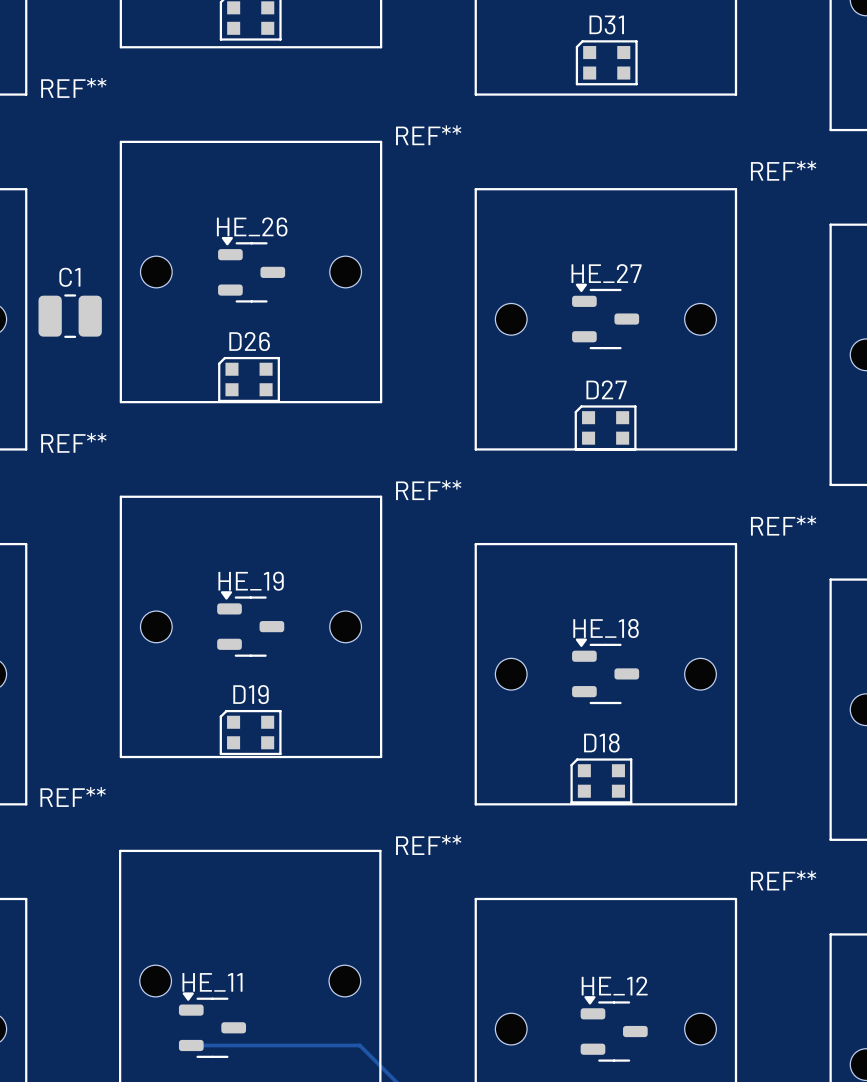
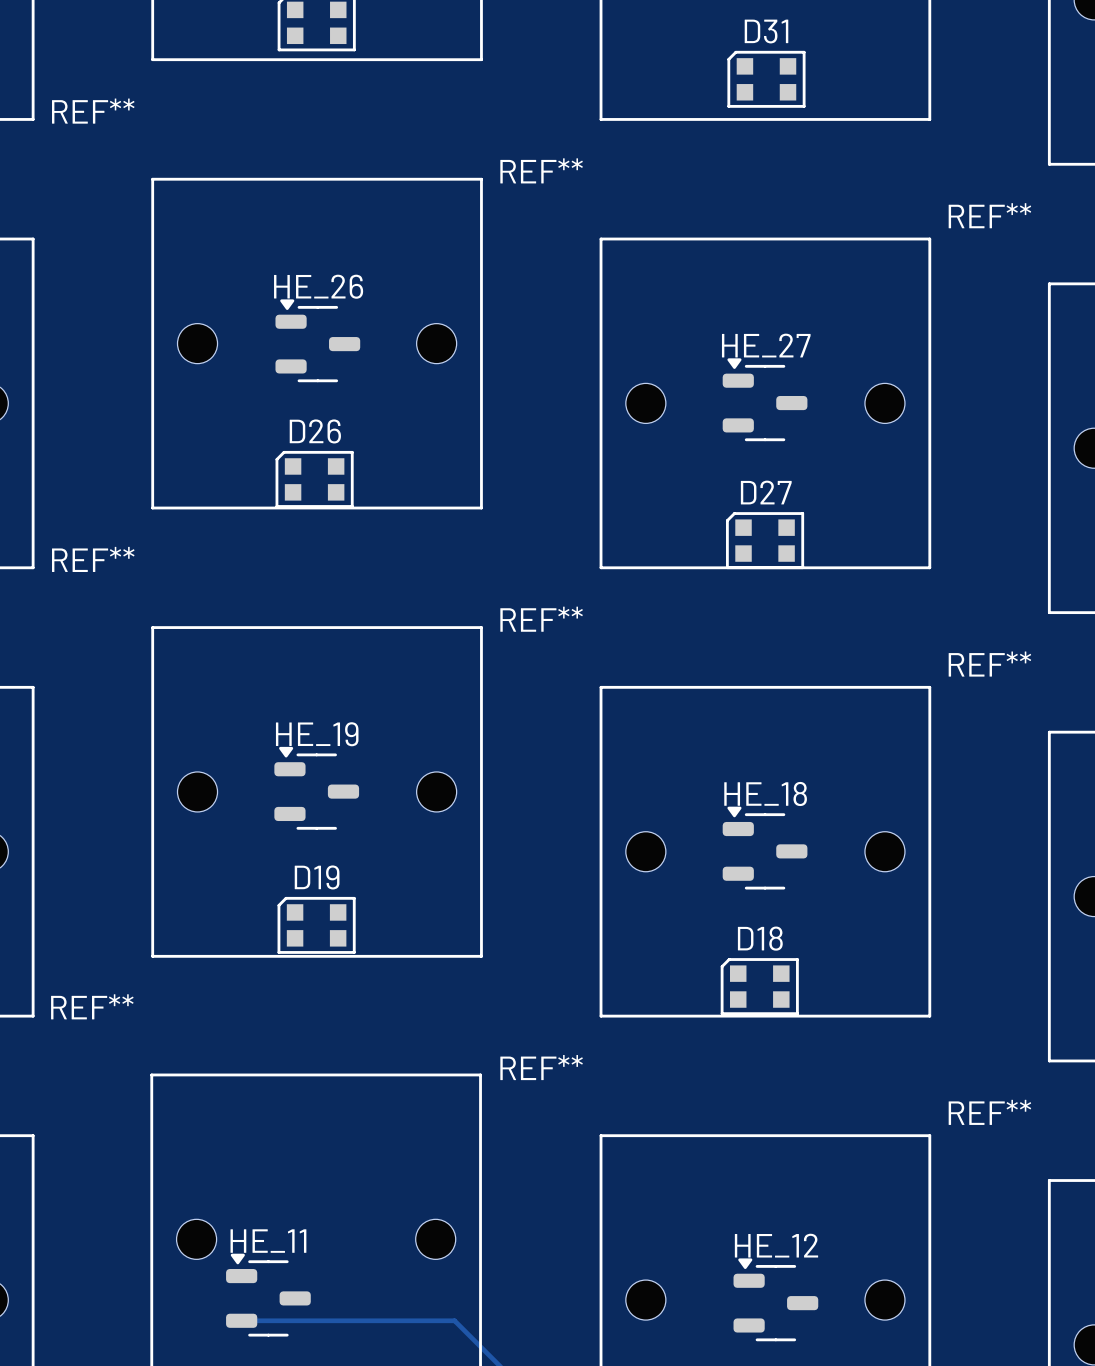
C1: (70, 316) -> none

